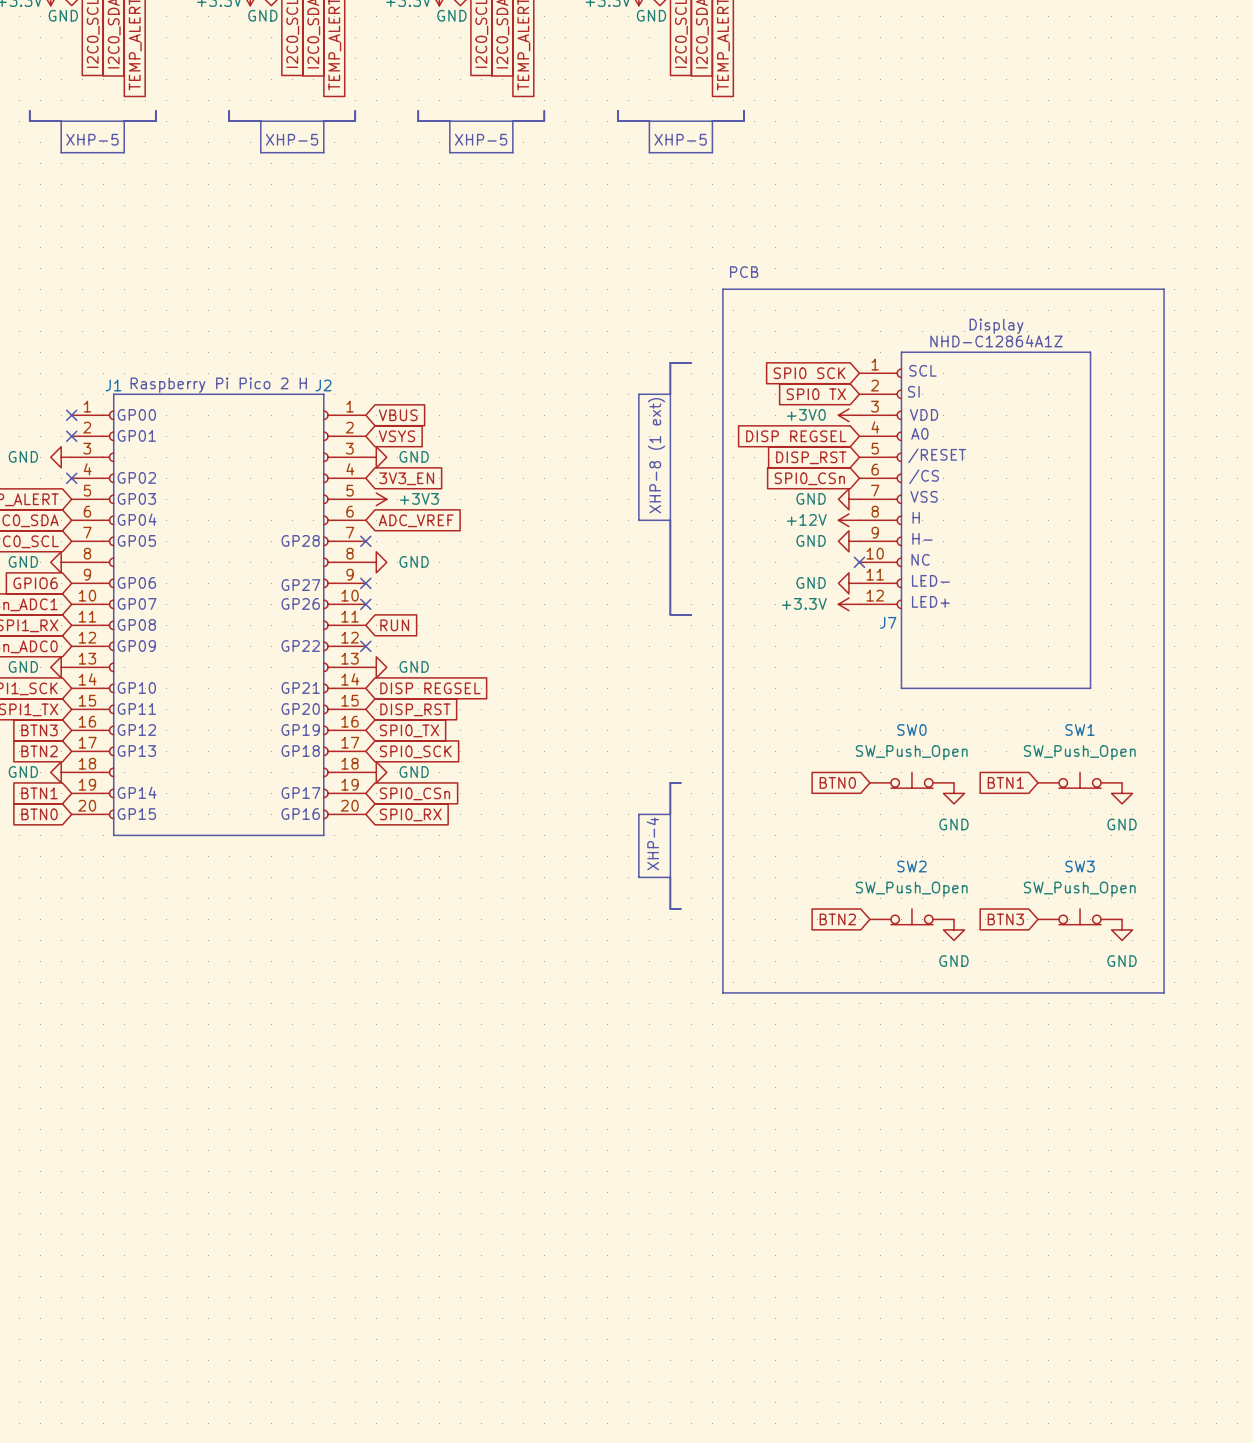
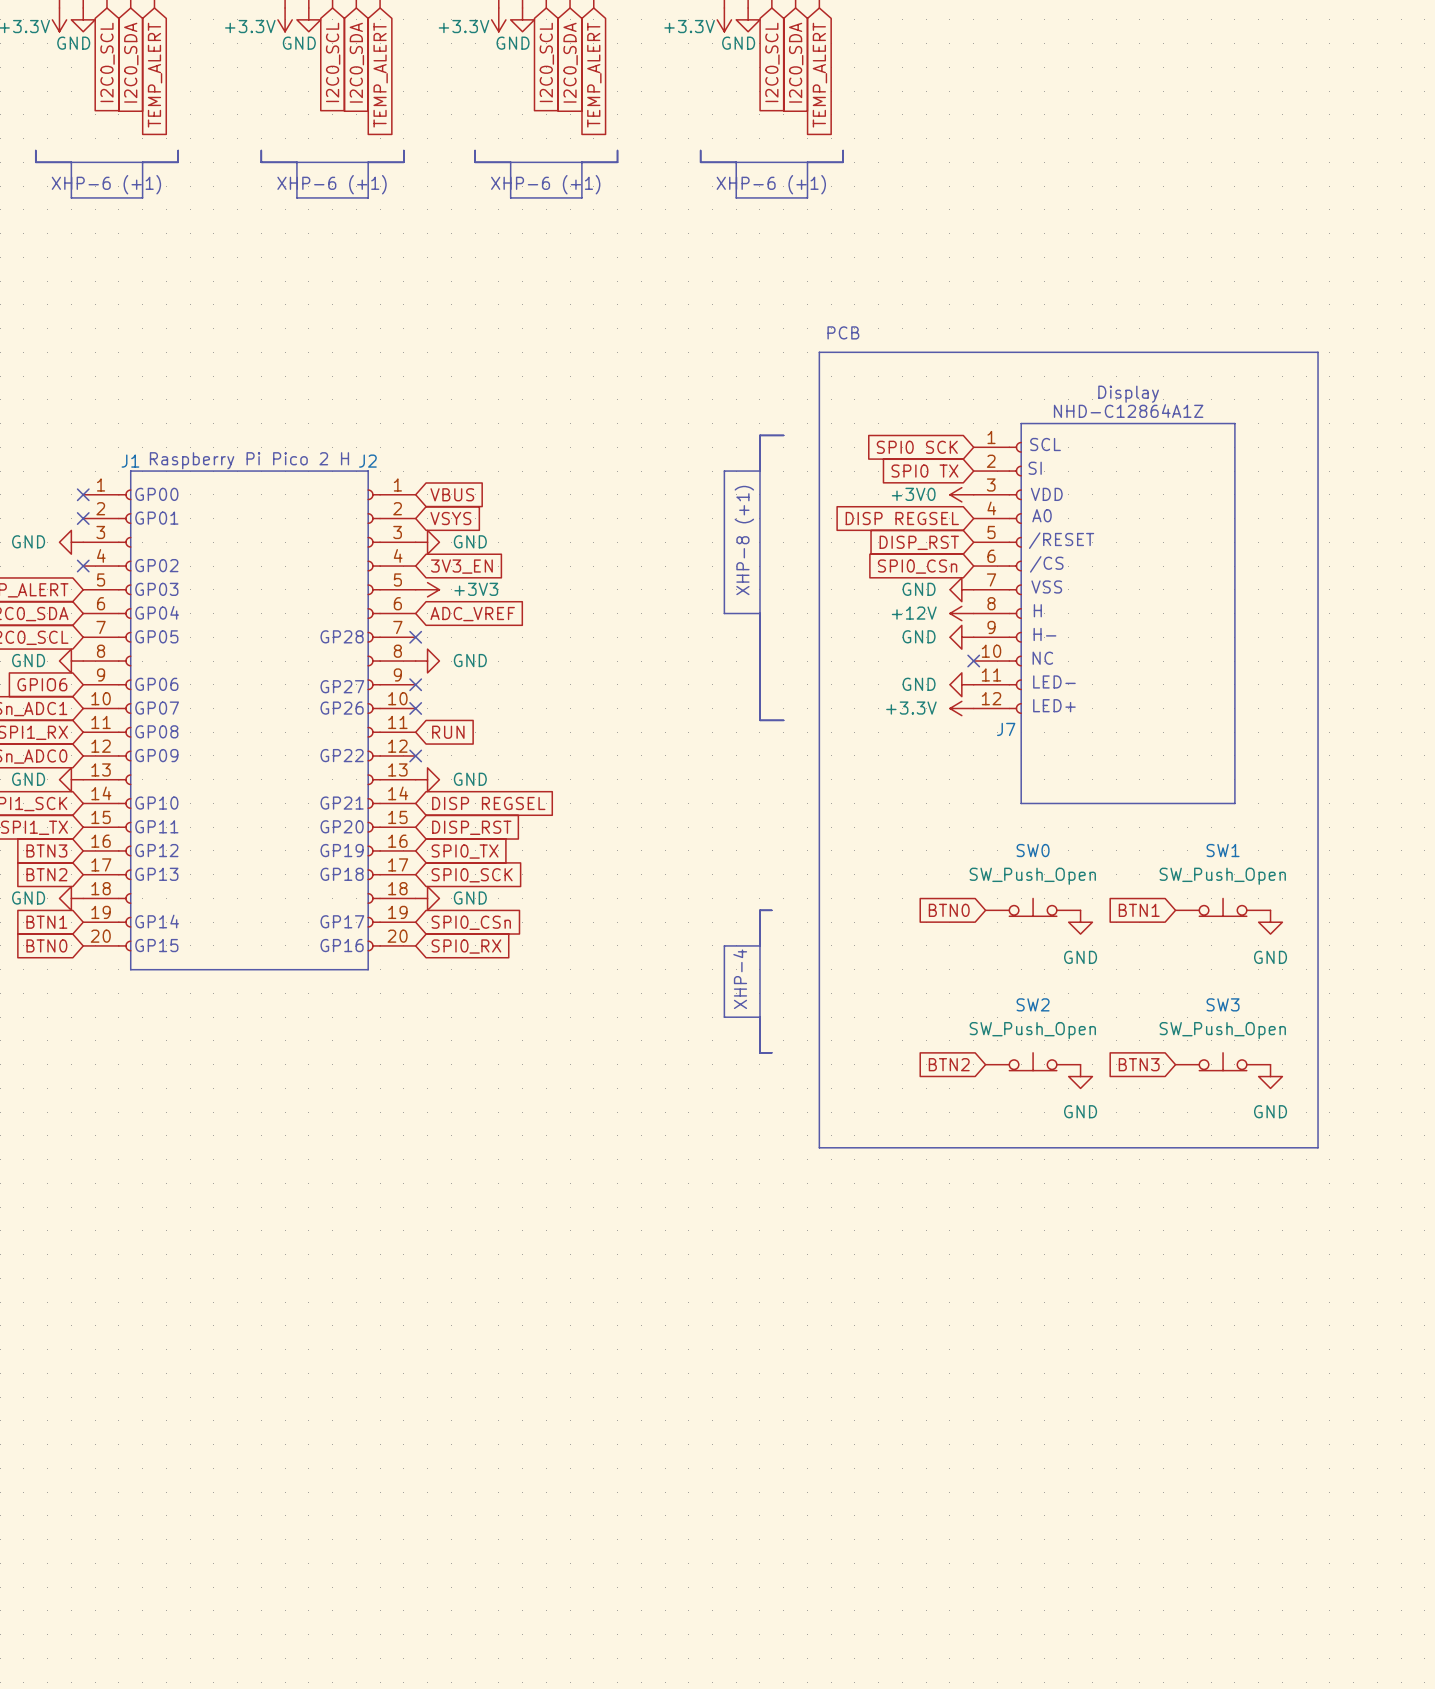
text: XHP-5 (92, 139) -> XHP-6 (+1) (106, 184)
text: XHP-5 (292, 139) -> XHP-6 (+1) (332, 184)
text: XHP-5 (481, 139) -> XHP-6 (+1) (545, 184)
text: XHP-5 (680, 139) -> XHP-6 (+1) (771, 184)
text: XHP-8 (1 ext) (656, 455) -> XHP-8 (+1) (744, 540)

